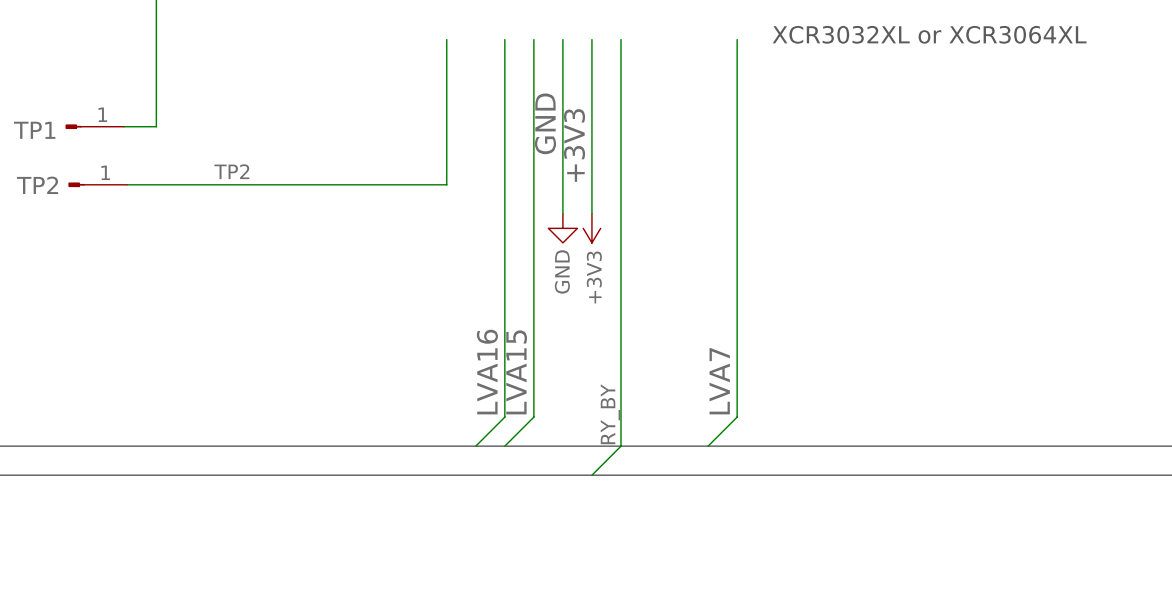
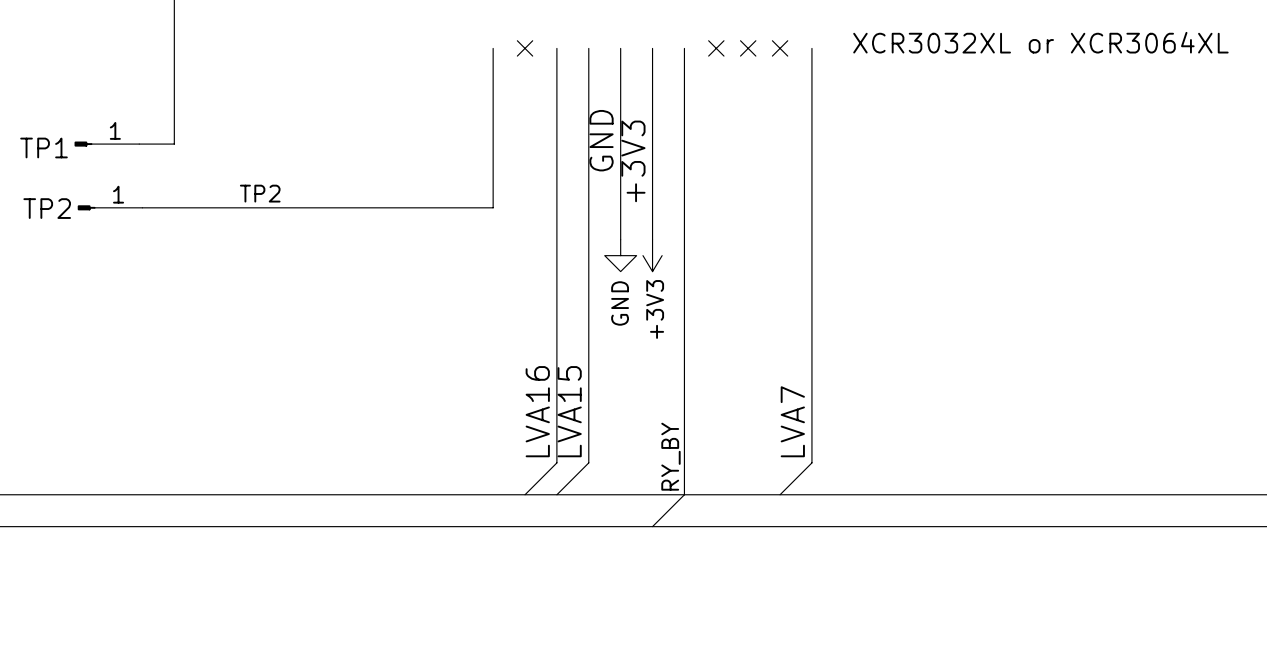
no-connect mark: none -> (525, 48)
no-connect mark: none -> (716, 48)
no-connect mark: none -> (748, 48)
no-connect mark: none -> (780, 48)

